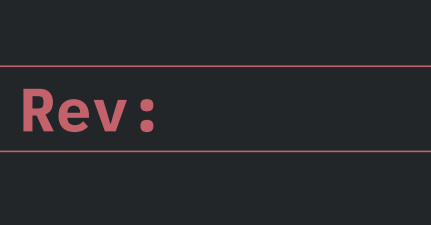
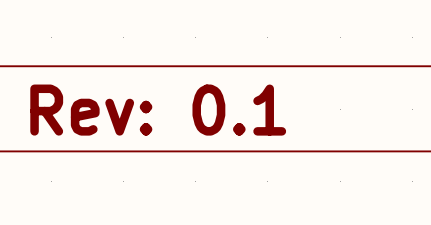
title block: Rev: (88, 110) -> Rev: 0.1 (158, 110)

